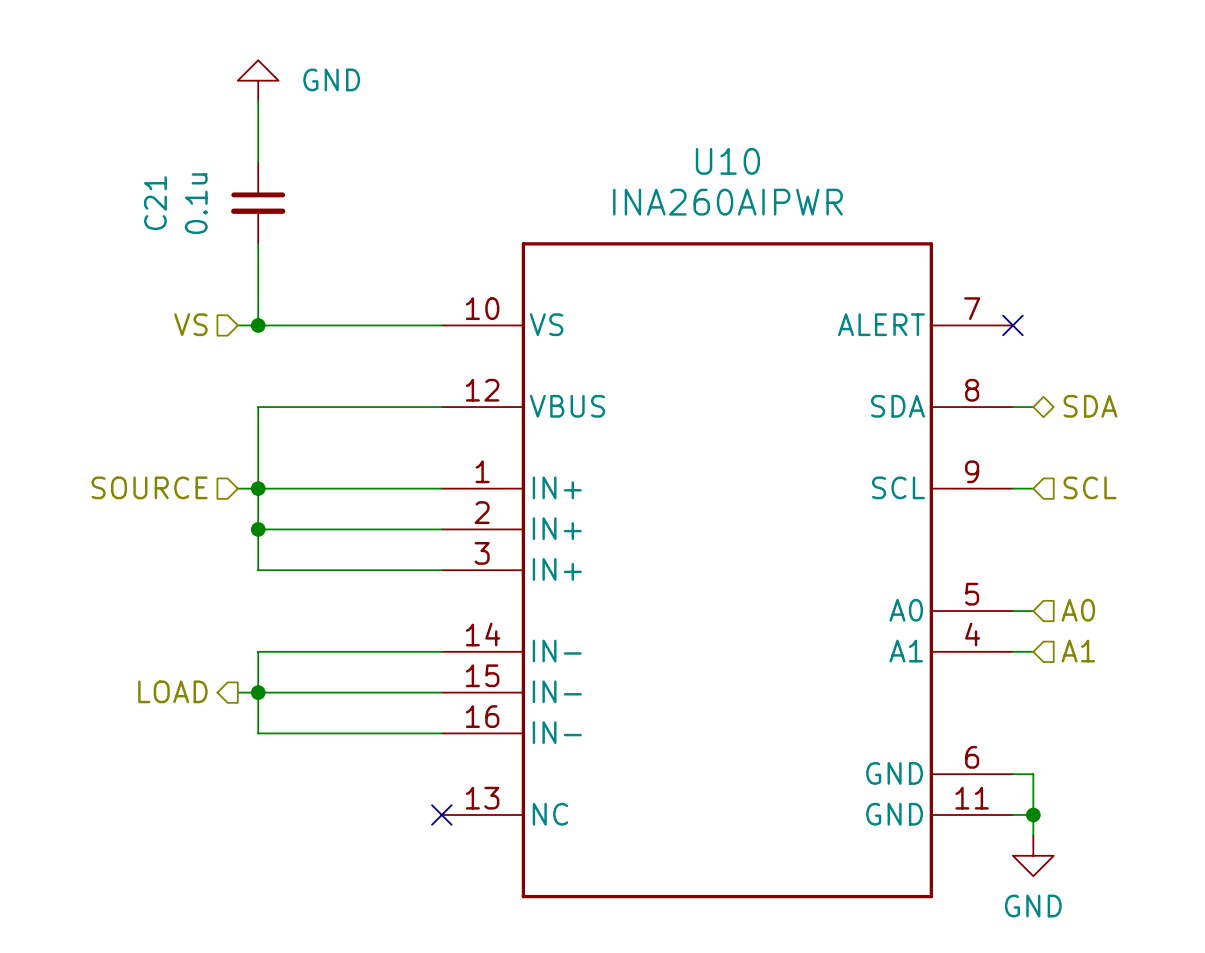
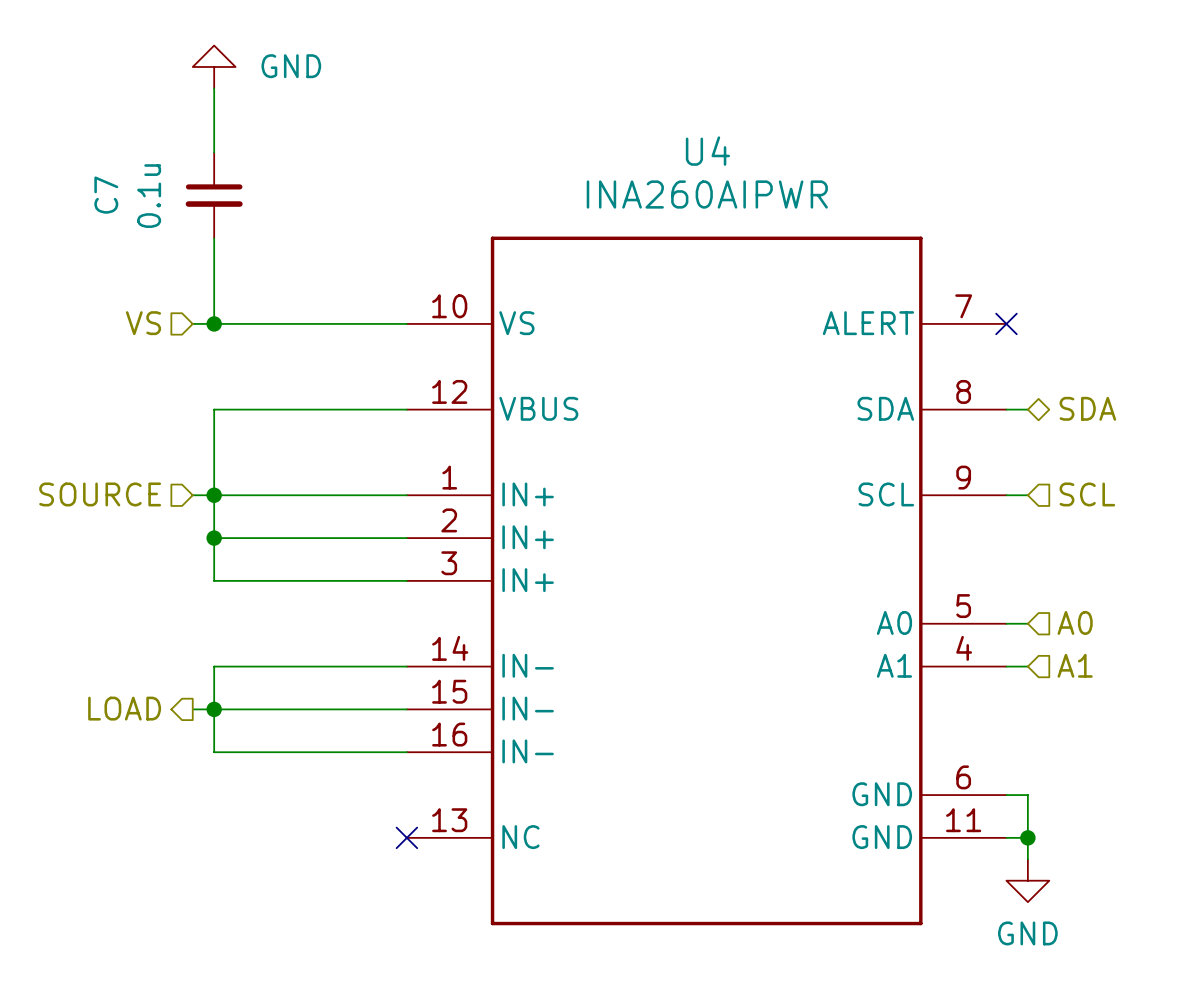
U10 name: U10 (727, 161) -> U4 (707, 151)
C21 name: C21 (155, 203) -> C7 (106, 195)

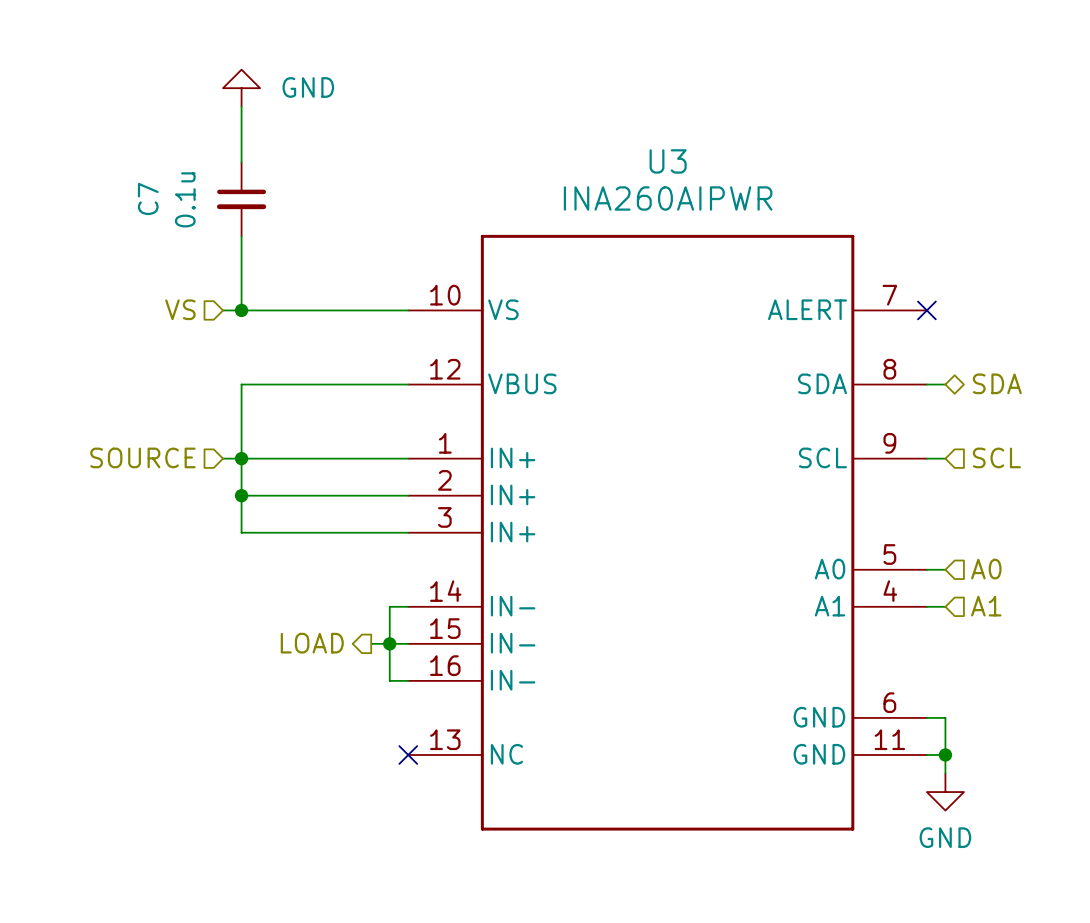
U4 name: U4 (707, 151) -> U3 (668, 161)
wire: (385, 666) (214, 666) (214, 752) (385, 752) -> (389, 606) (389, 680)
hierarchical label position: LOAD (124, 708) -> LOAD (312, 643)
wire: (192, 709) (364, 709) -> none
junction: (214, 709) -> none
junction: none -> (389, 643)

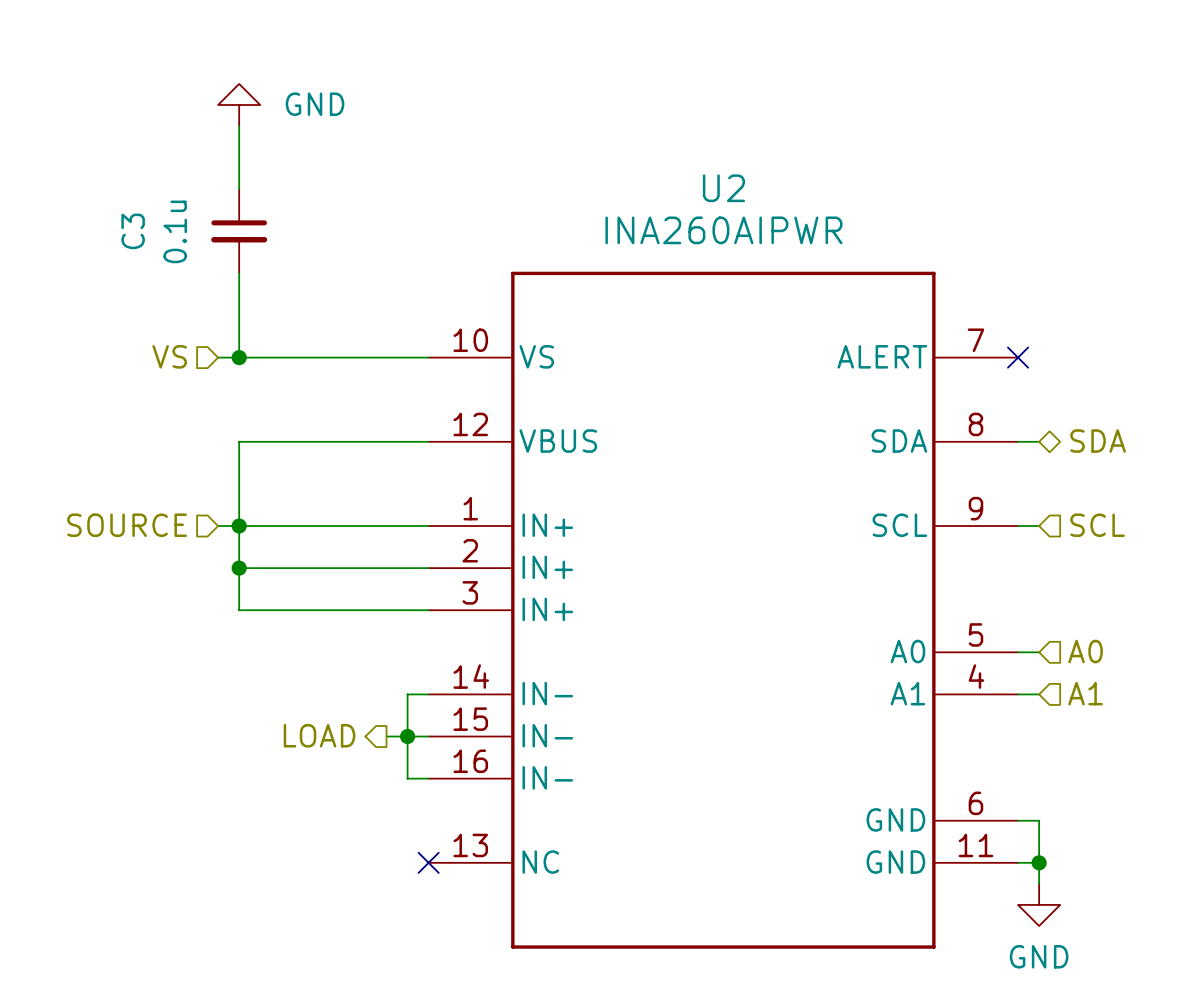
U3 name: U3 (668, 161) -> U2 (723, 188)
C7 name: C7 (148, 198) -> C3 (133, 231)

